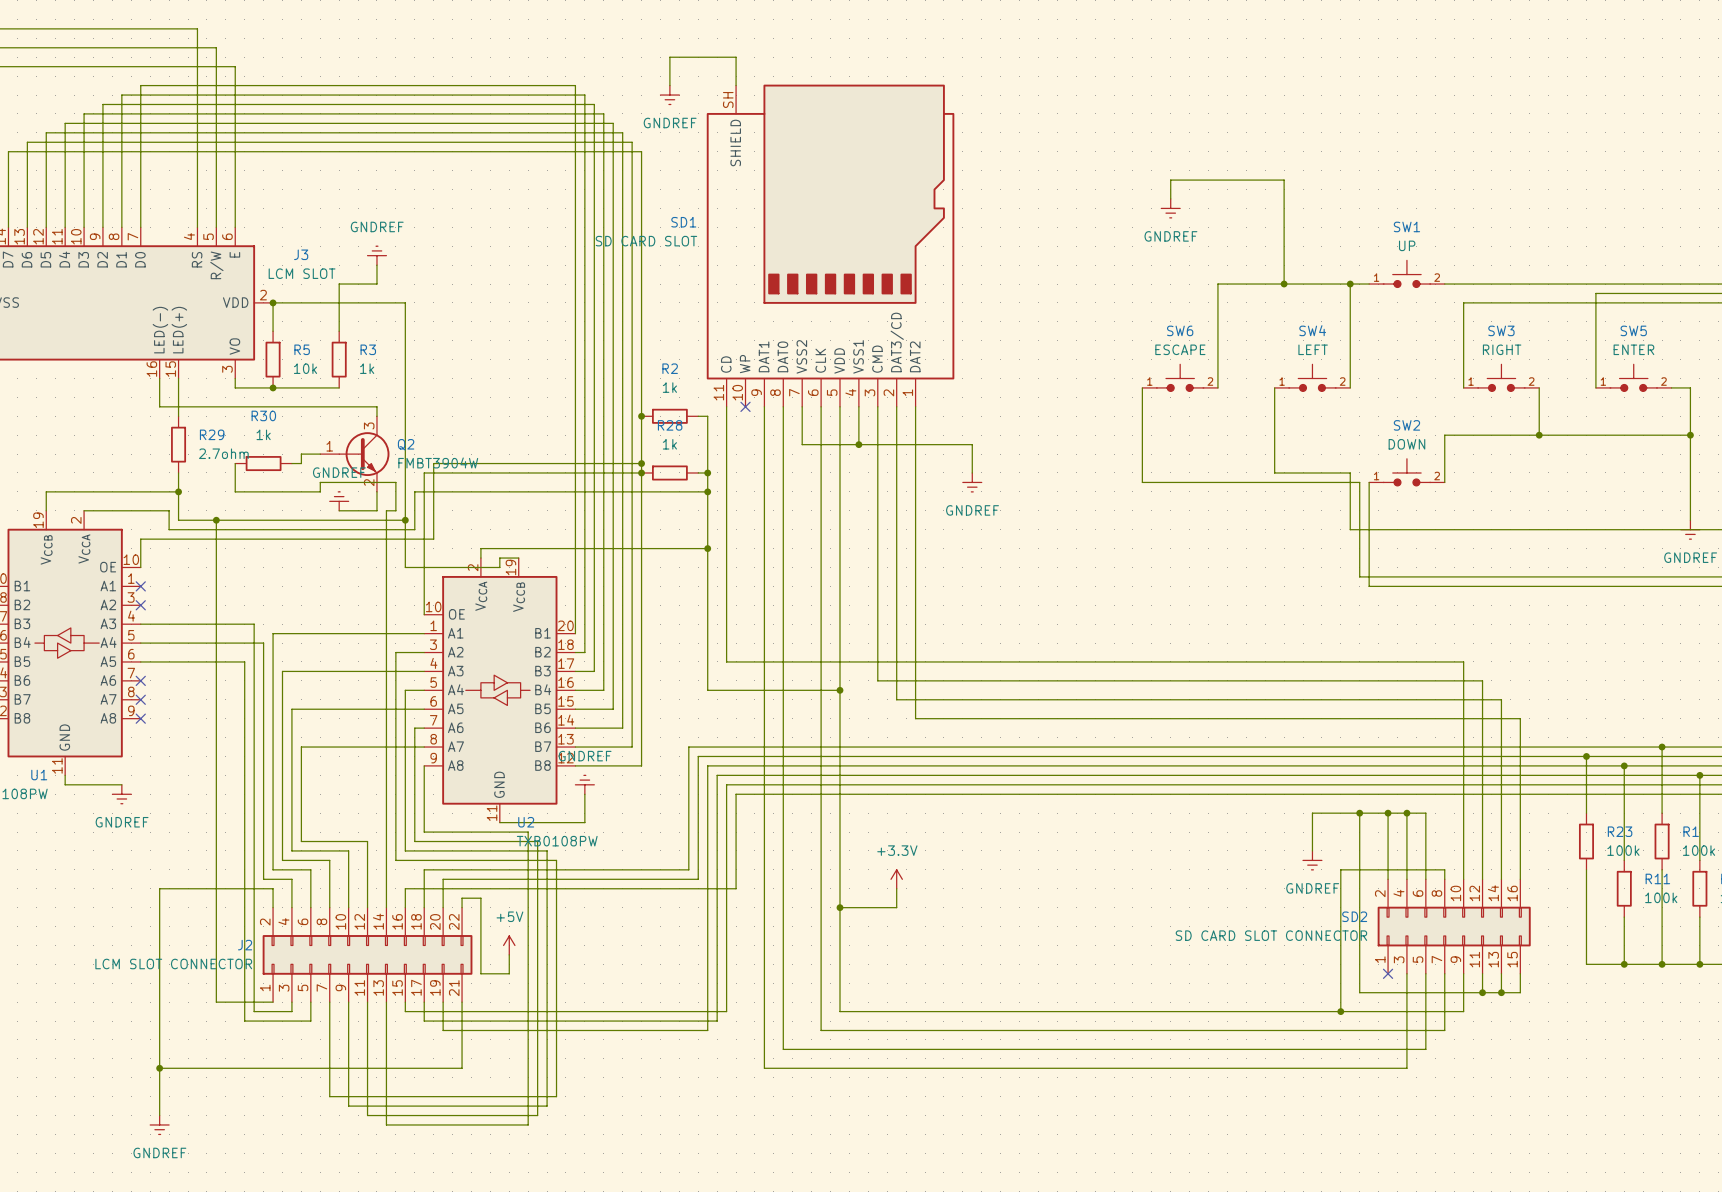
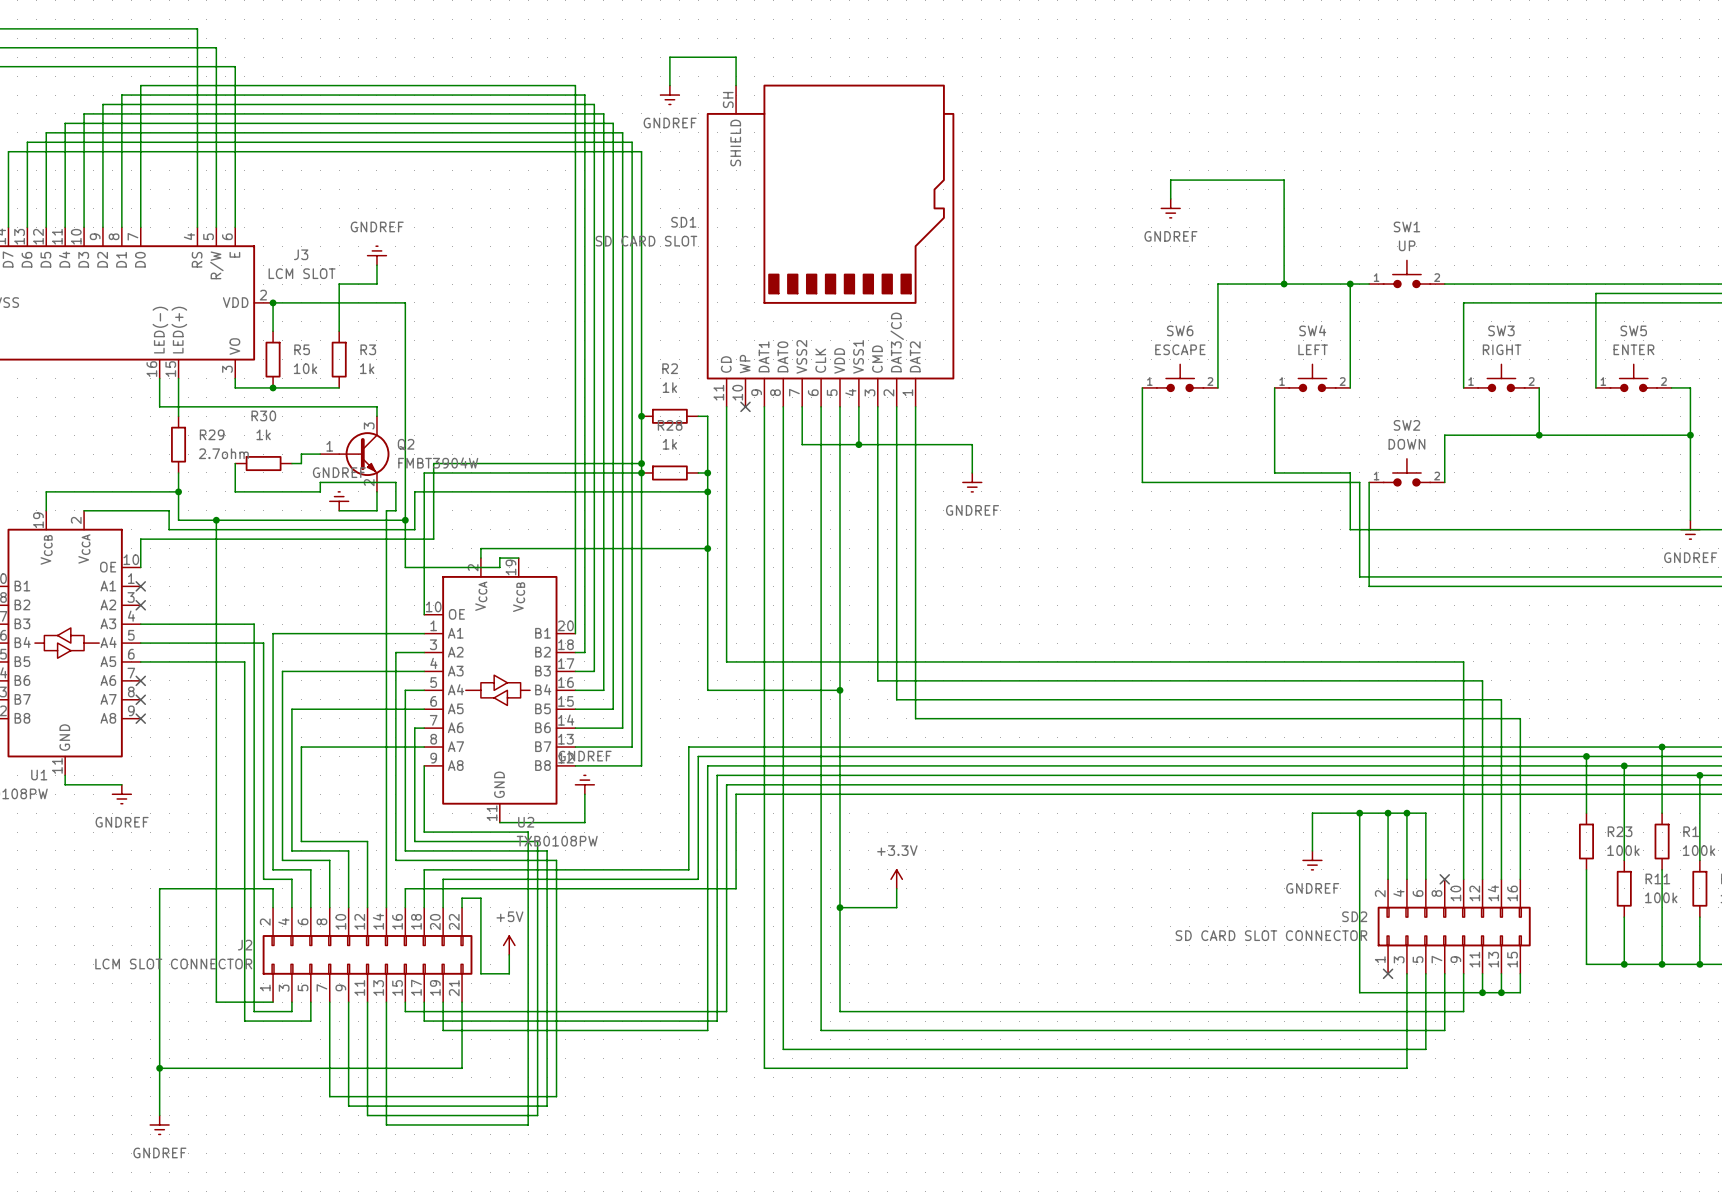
wire: (1444, 879) (1444, 869) (1340, 869) (1340, 1011) -> none
no-connect mark: none -> (1444, 879)
junction: (1340, 1011) -> none

